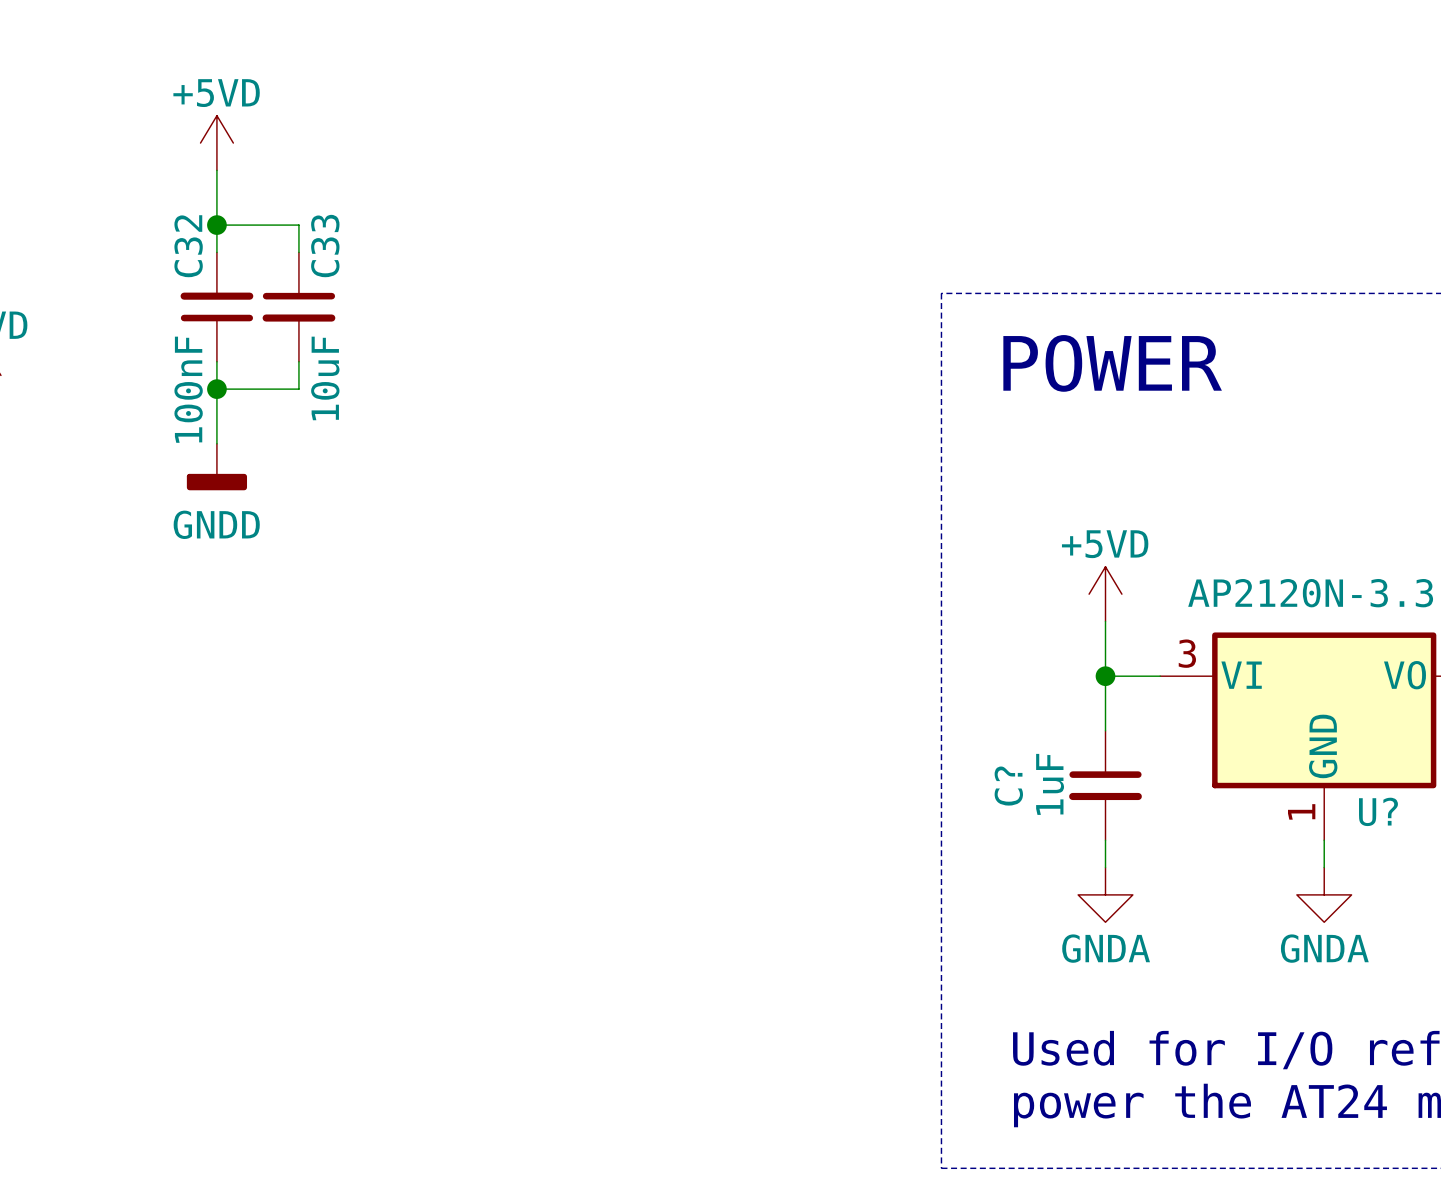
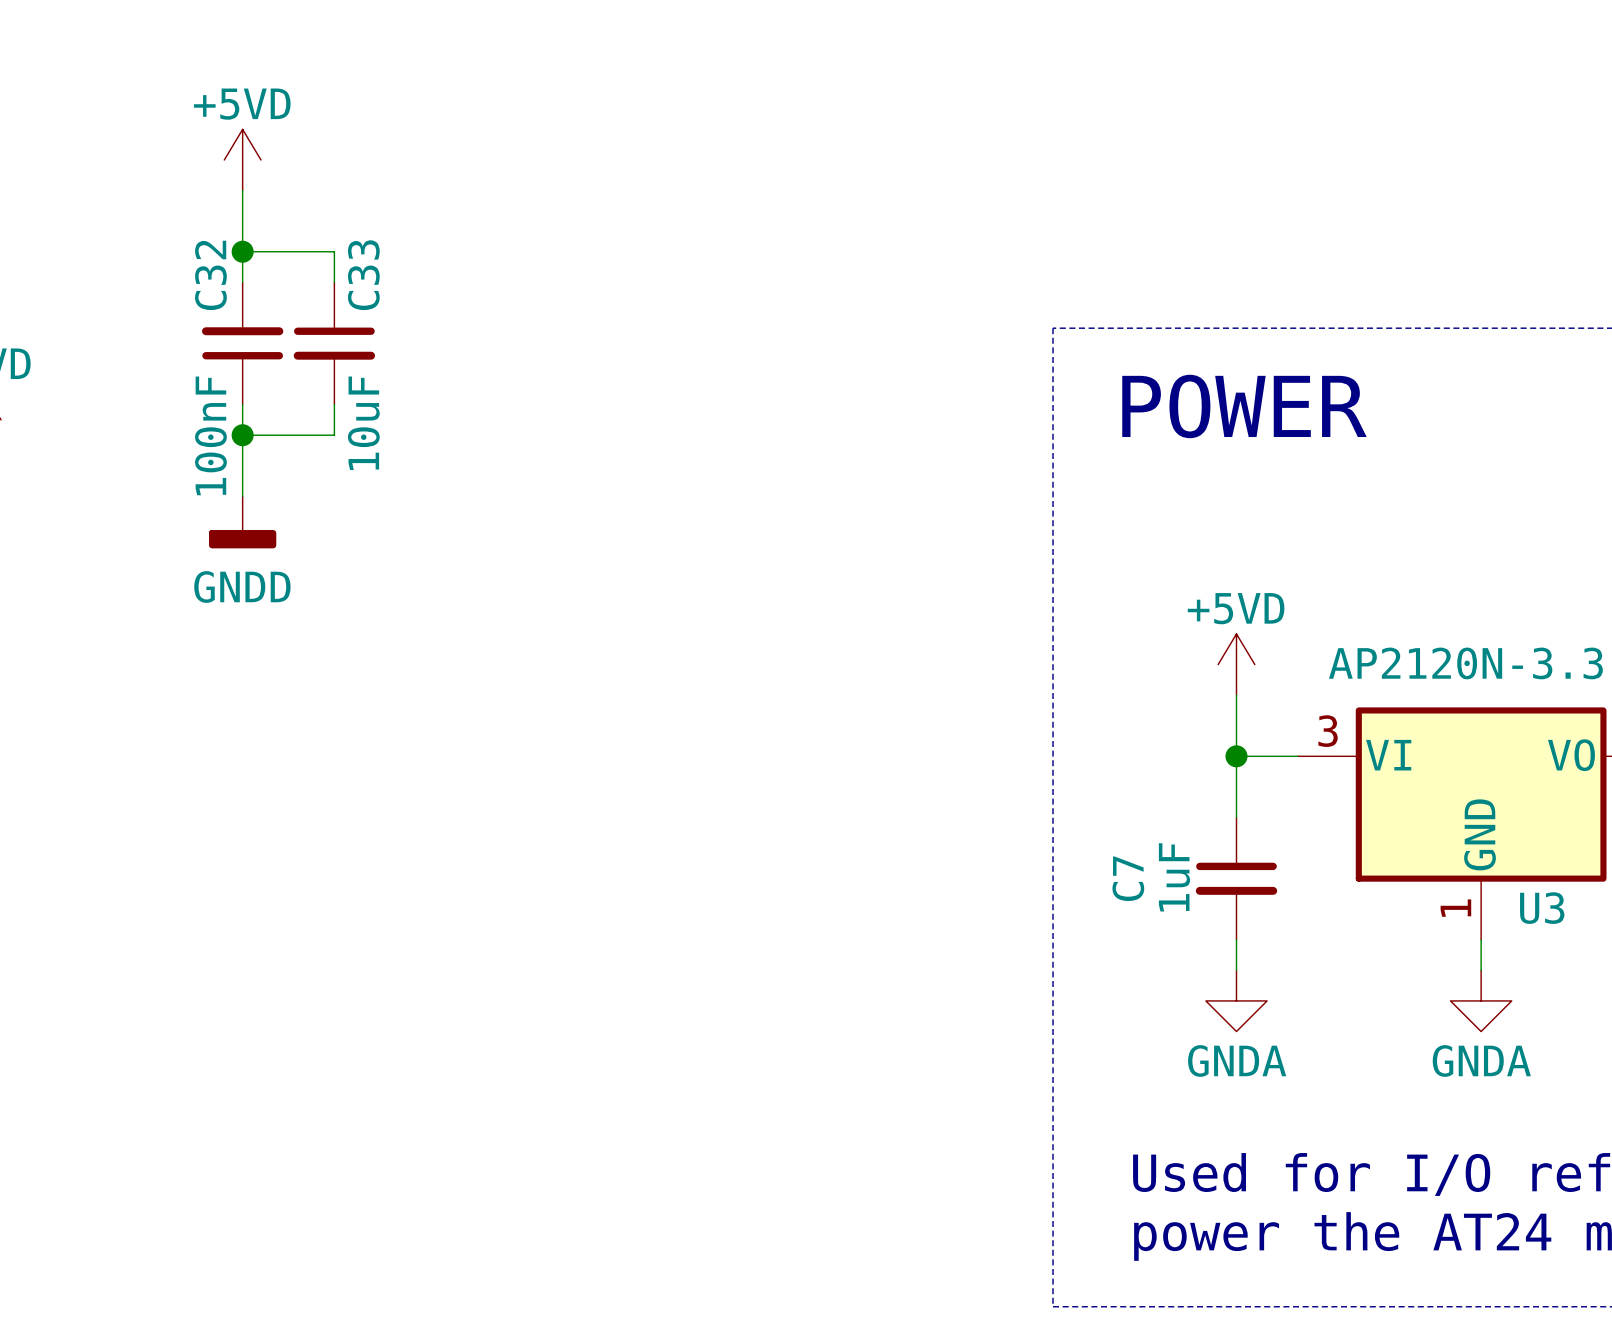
C? name: C? (1008, 786) -> C7 (1128, 878)
U? name: U? (1378, 811) -> U3 (1542, 908)

